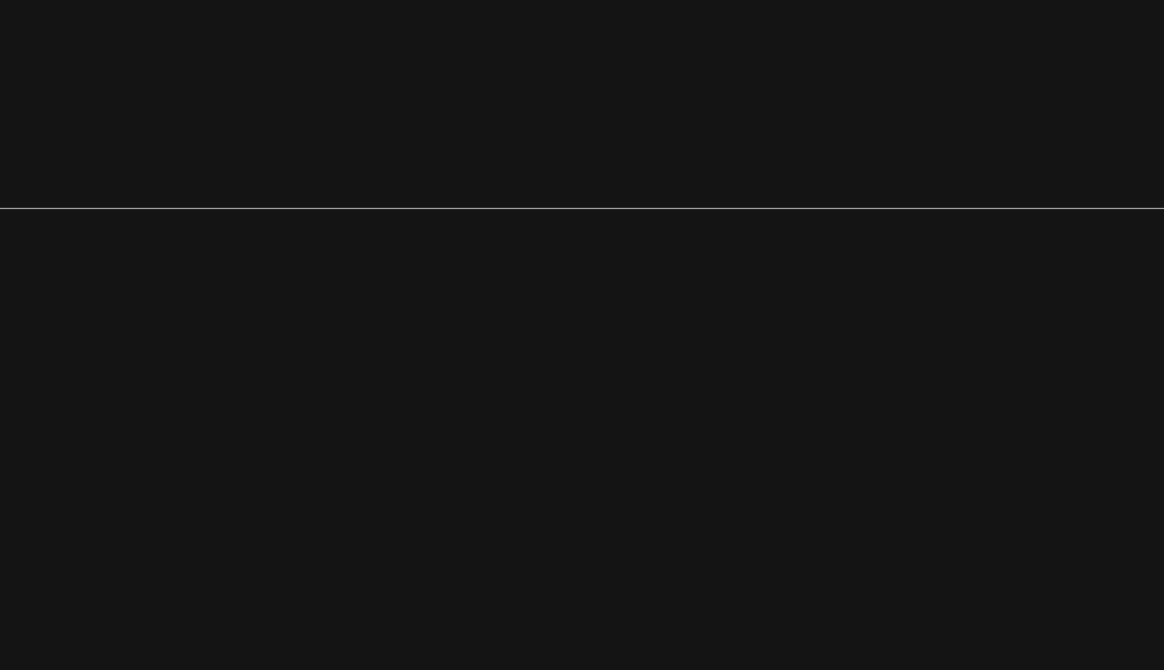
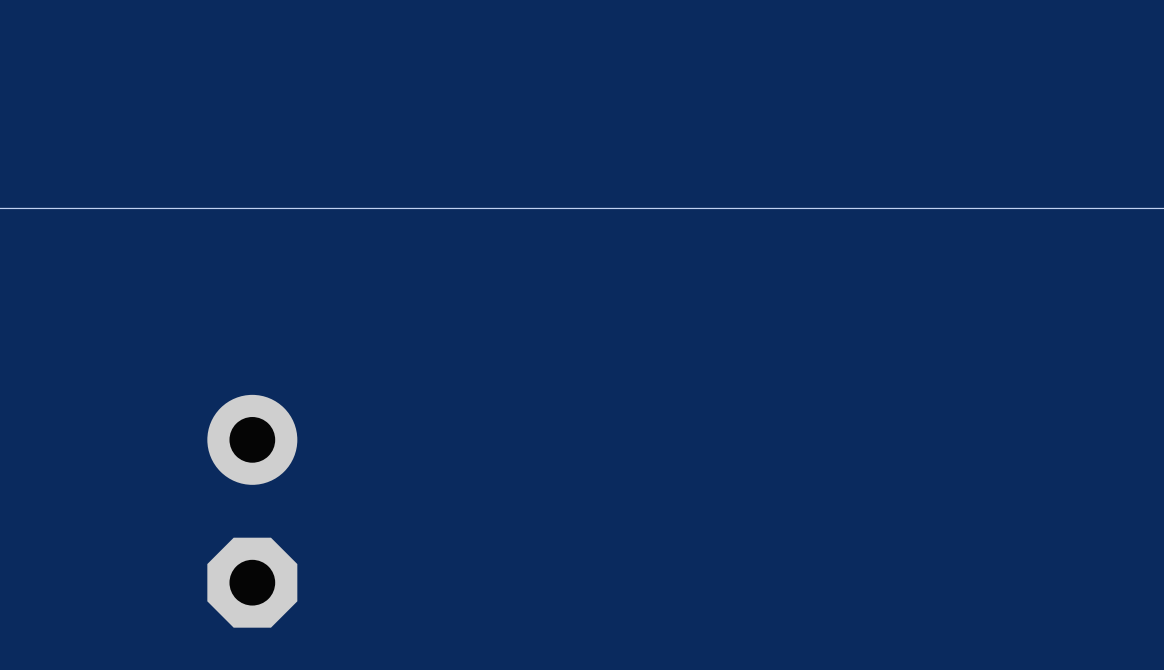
part: none -> (252, 511)

